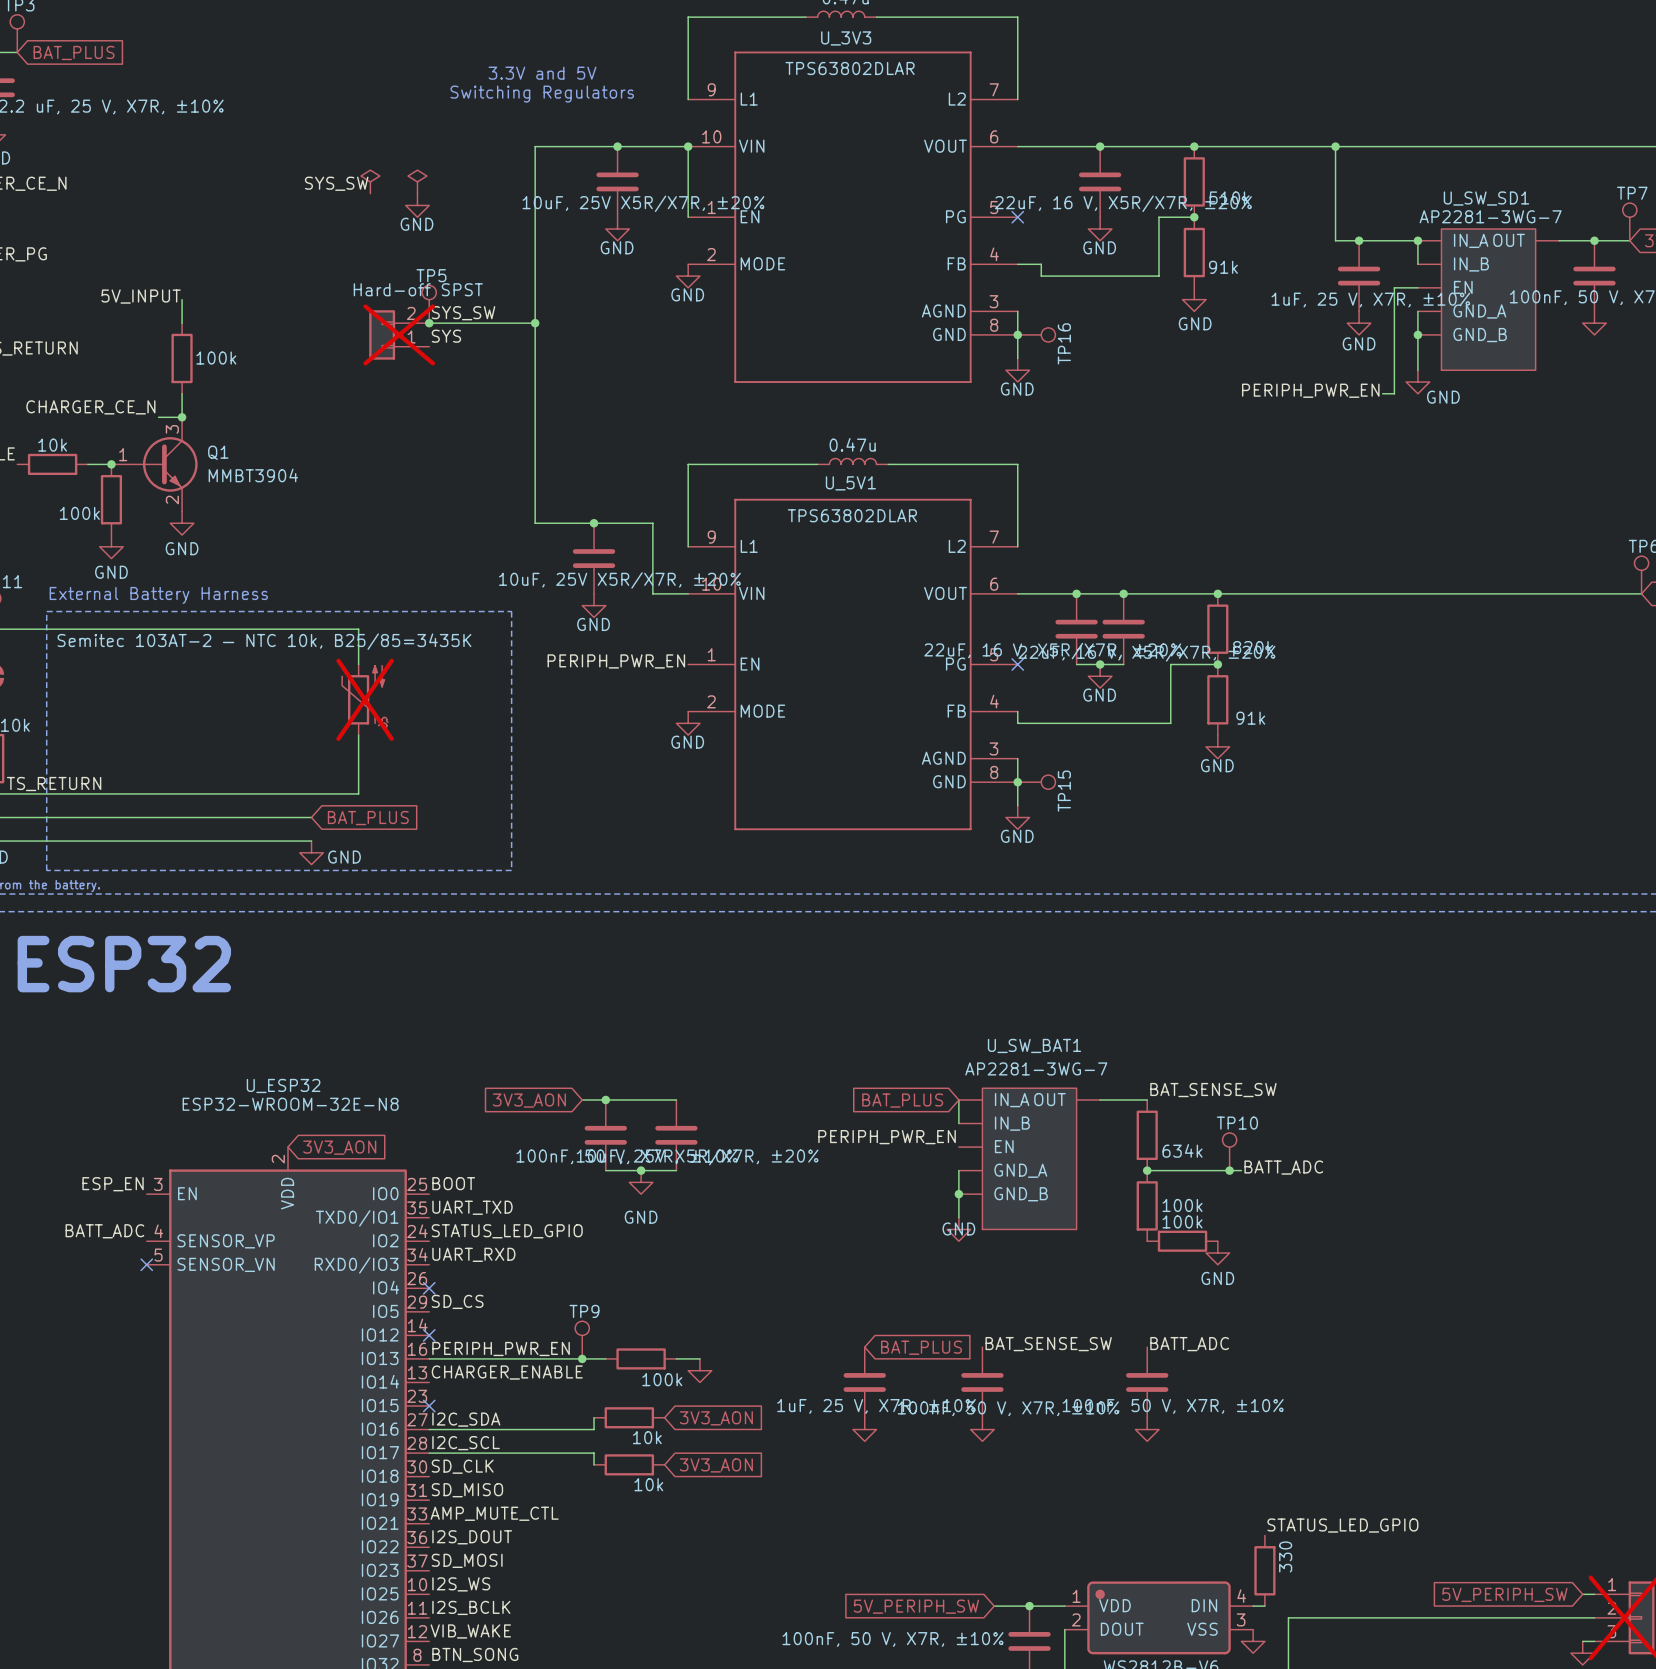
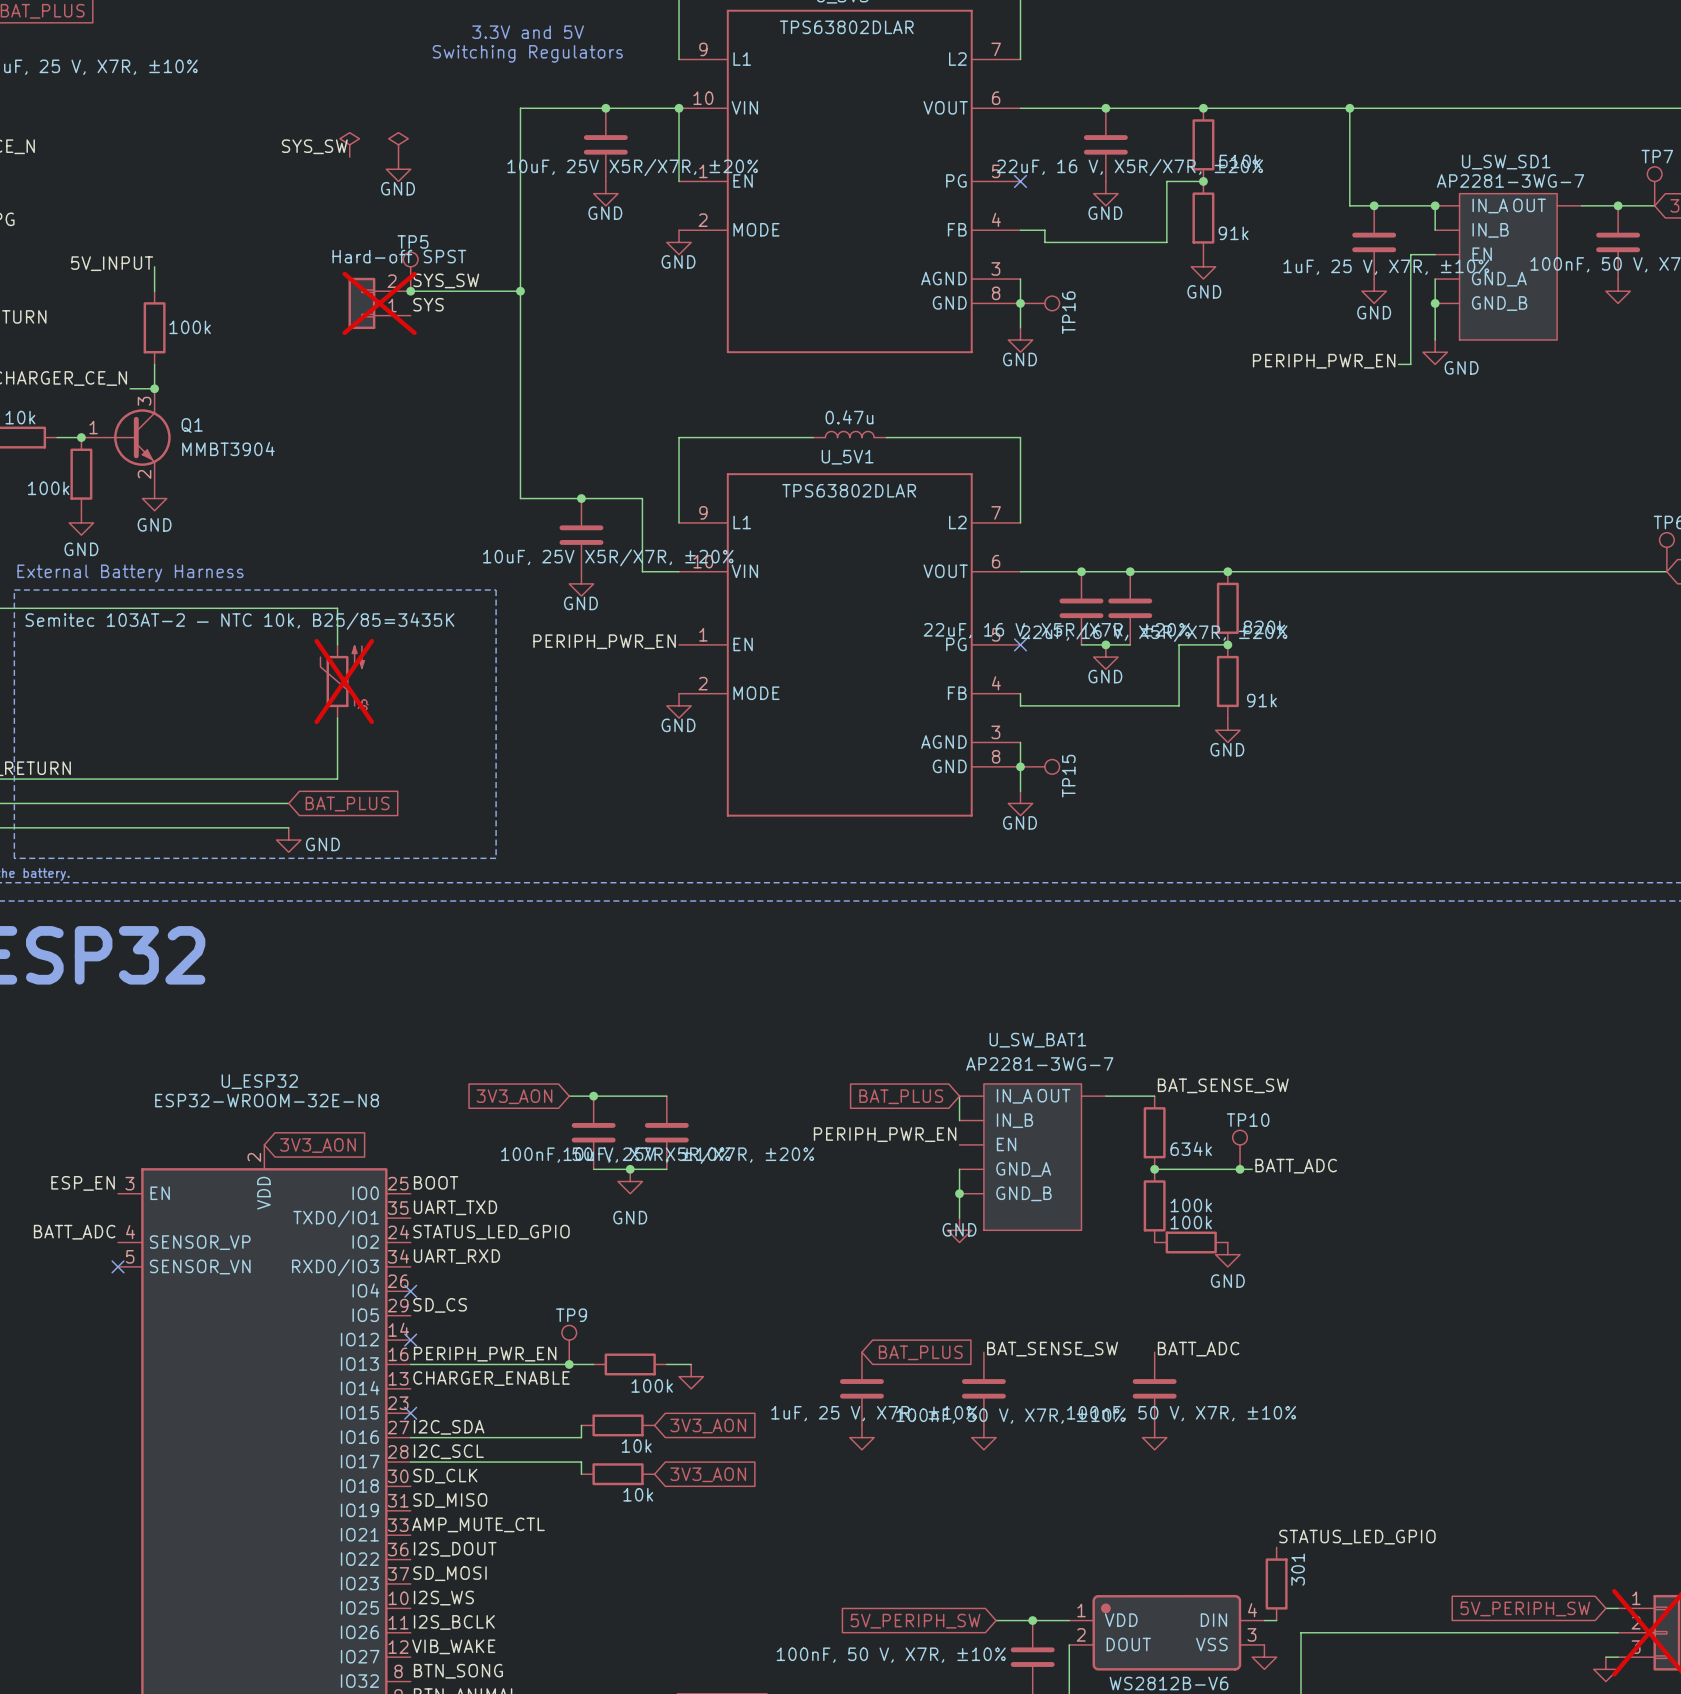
part value: 330 (1285, 1556) -> 301 (1298, 1569)

